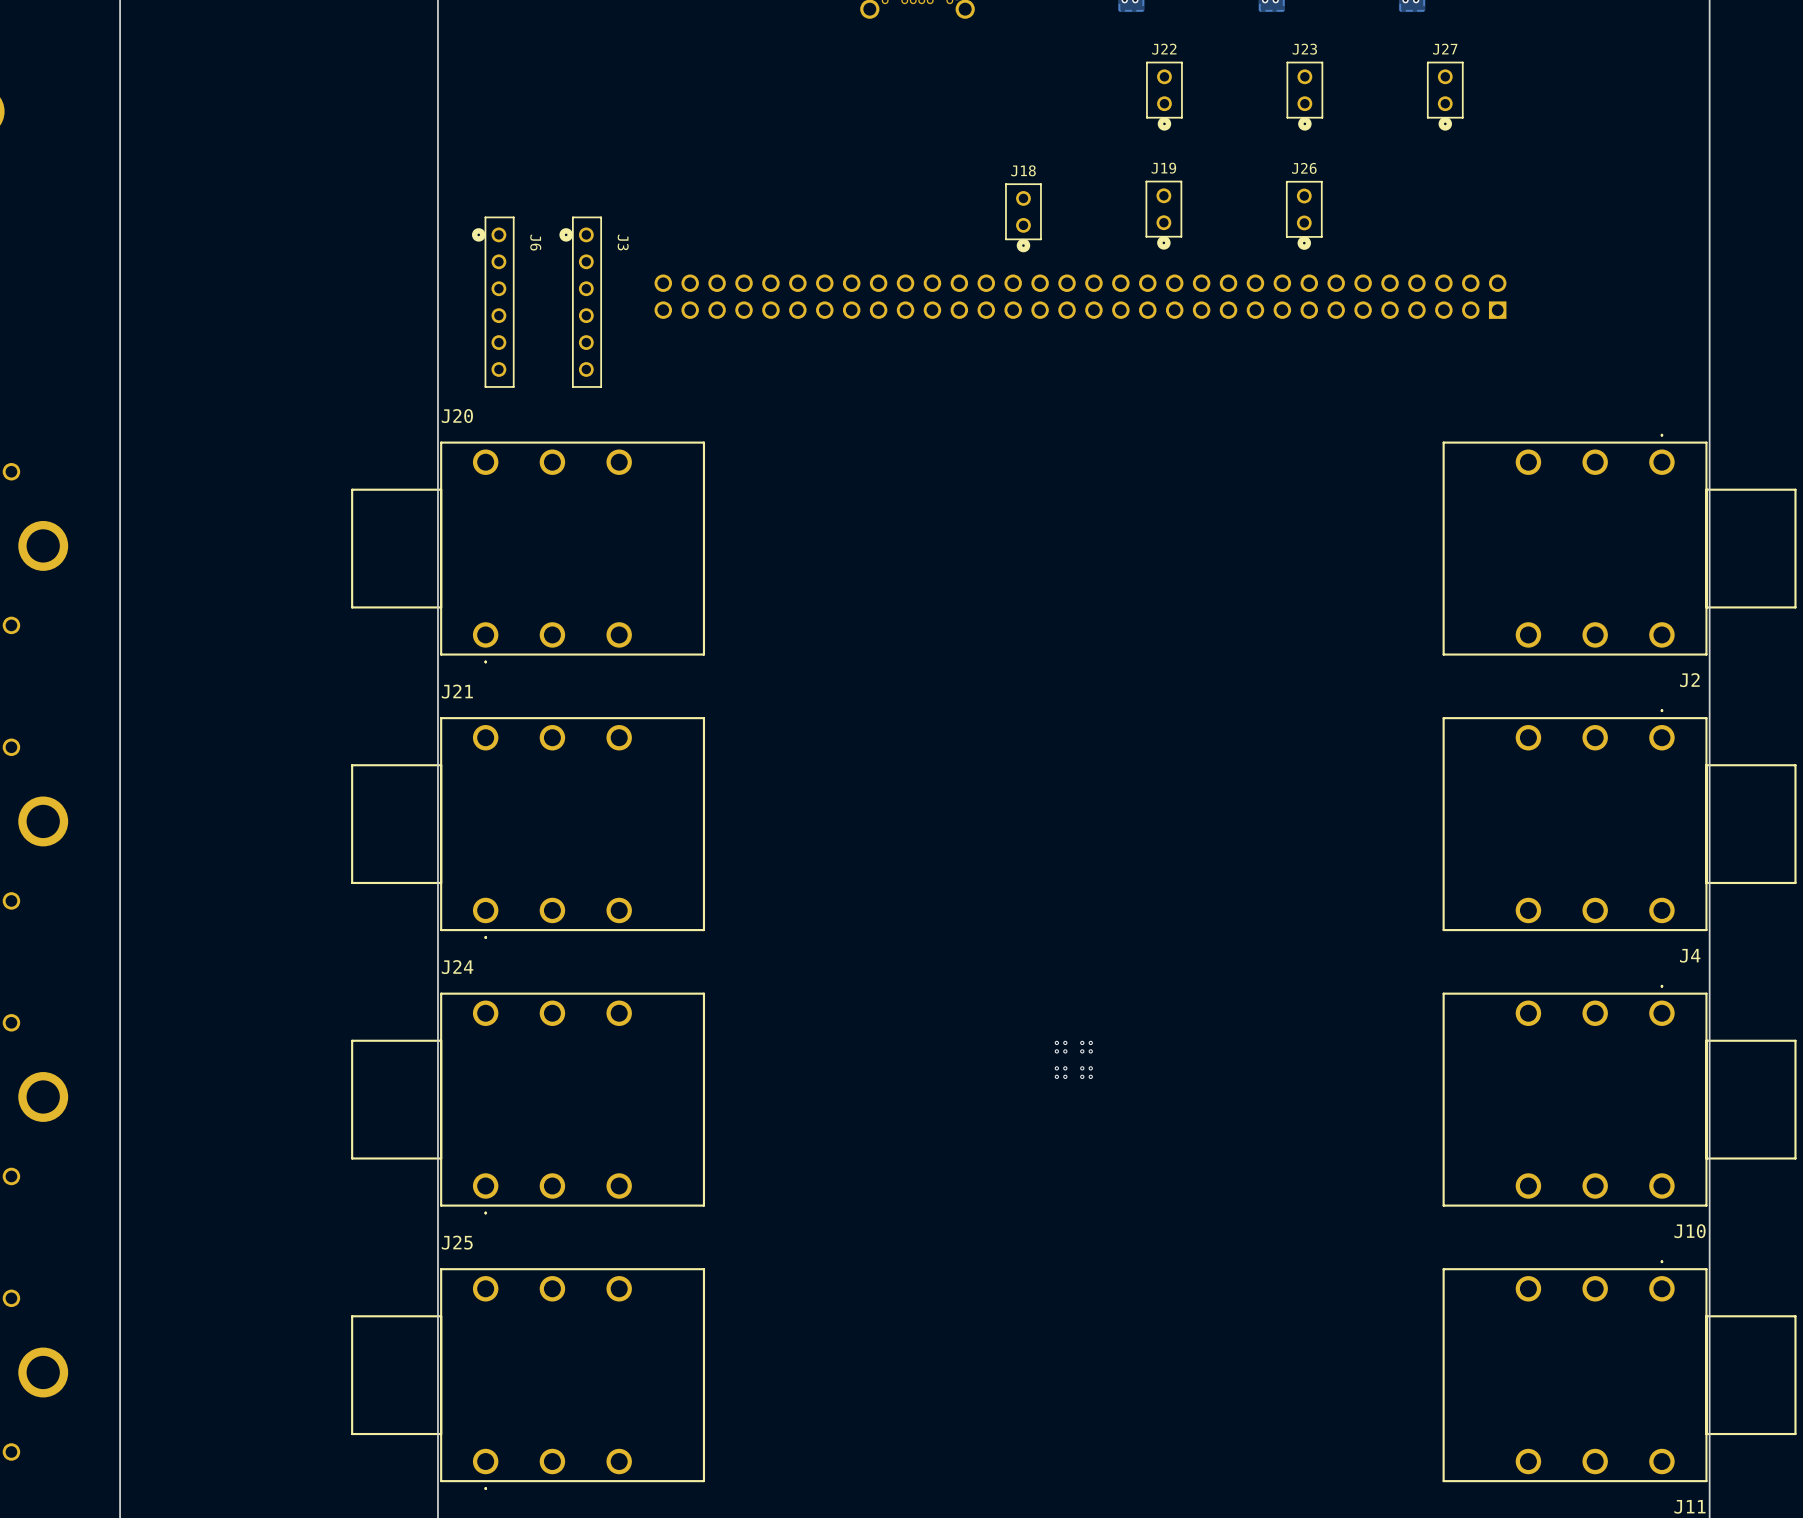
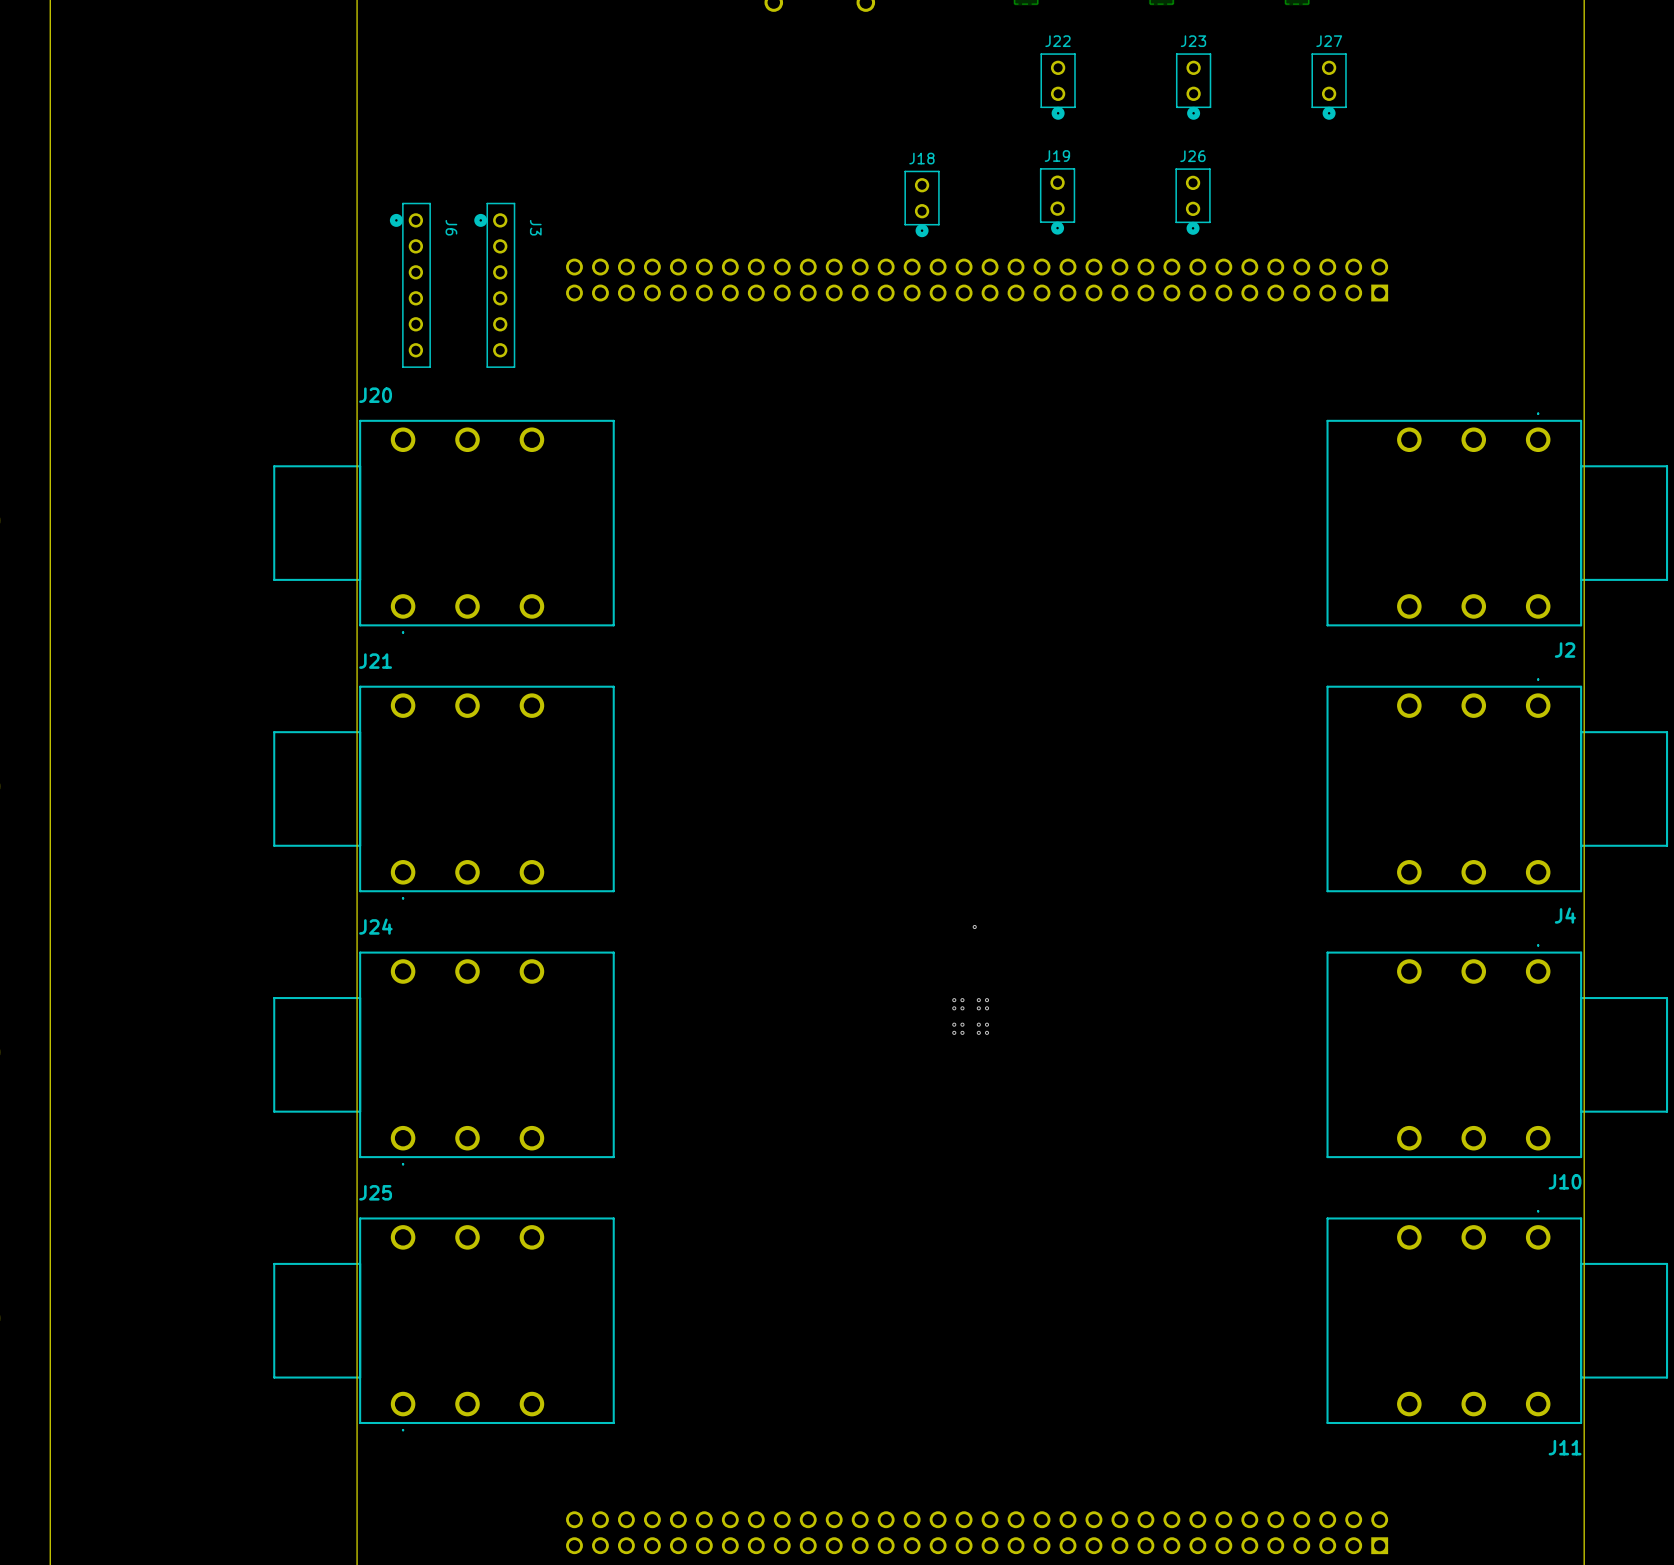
via: none -> (974, 927)

